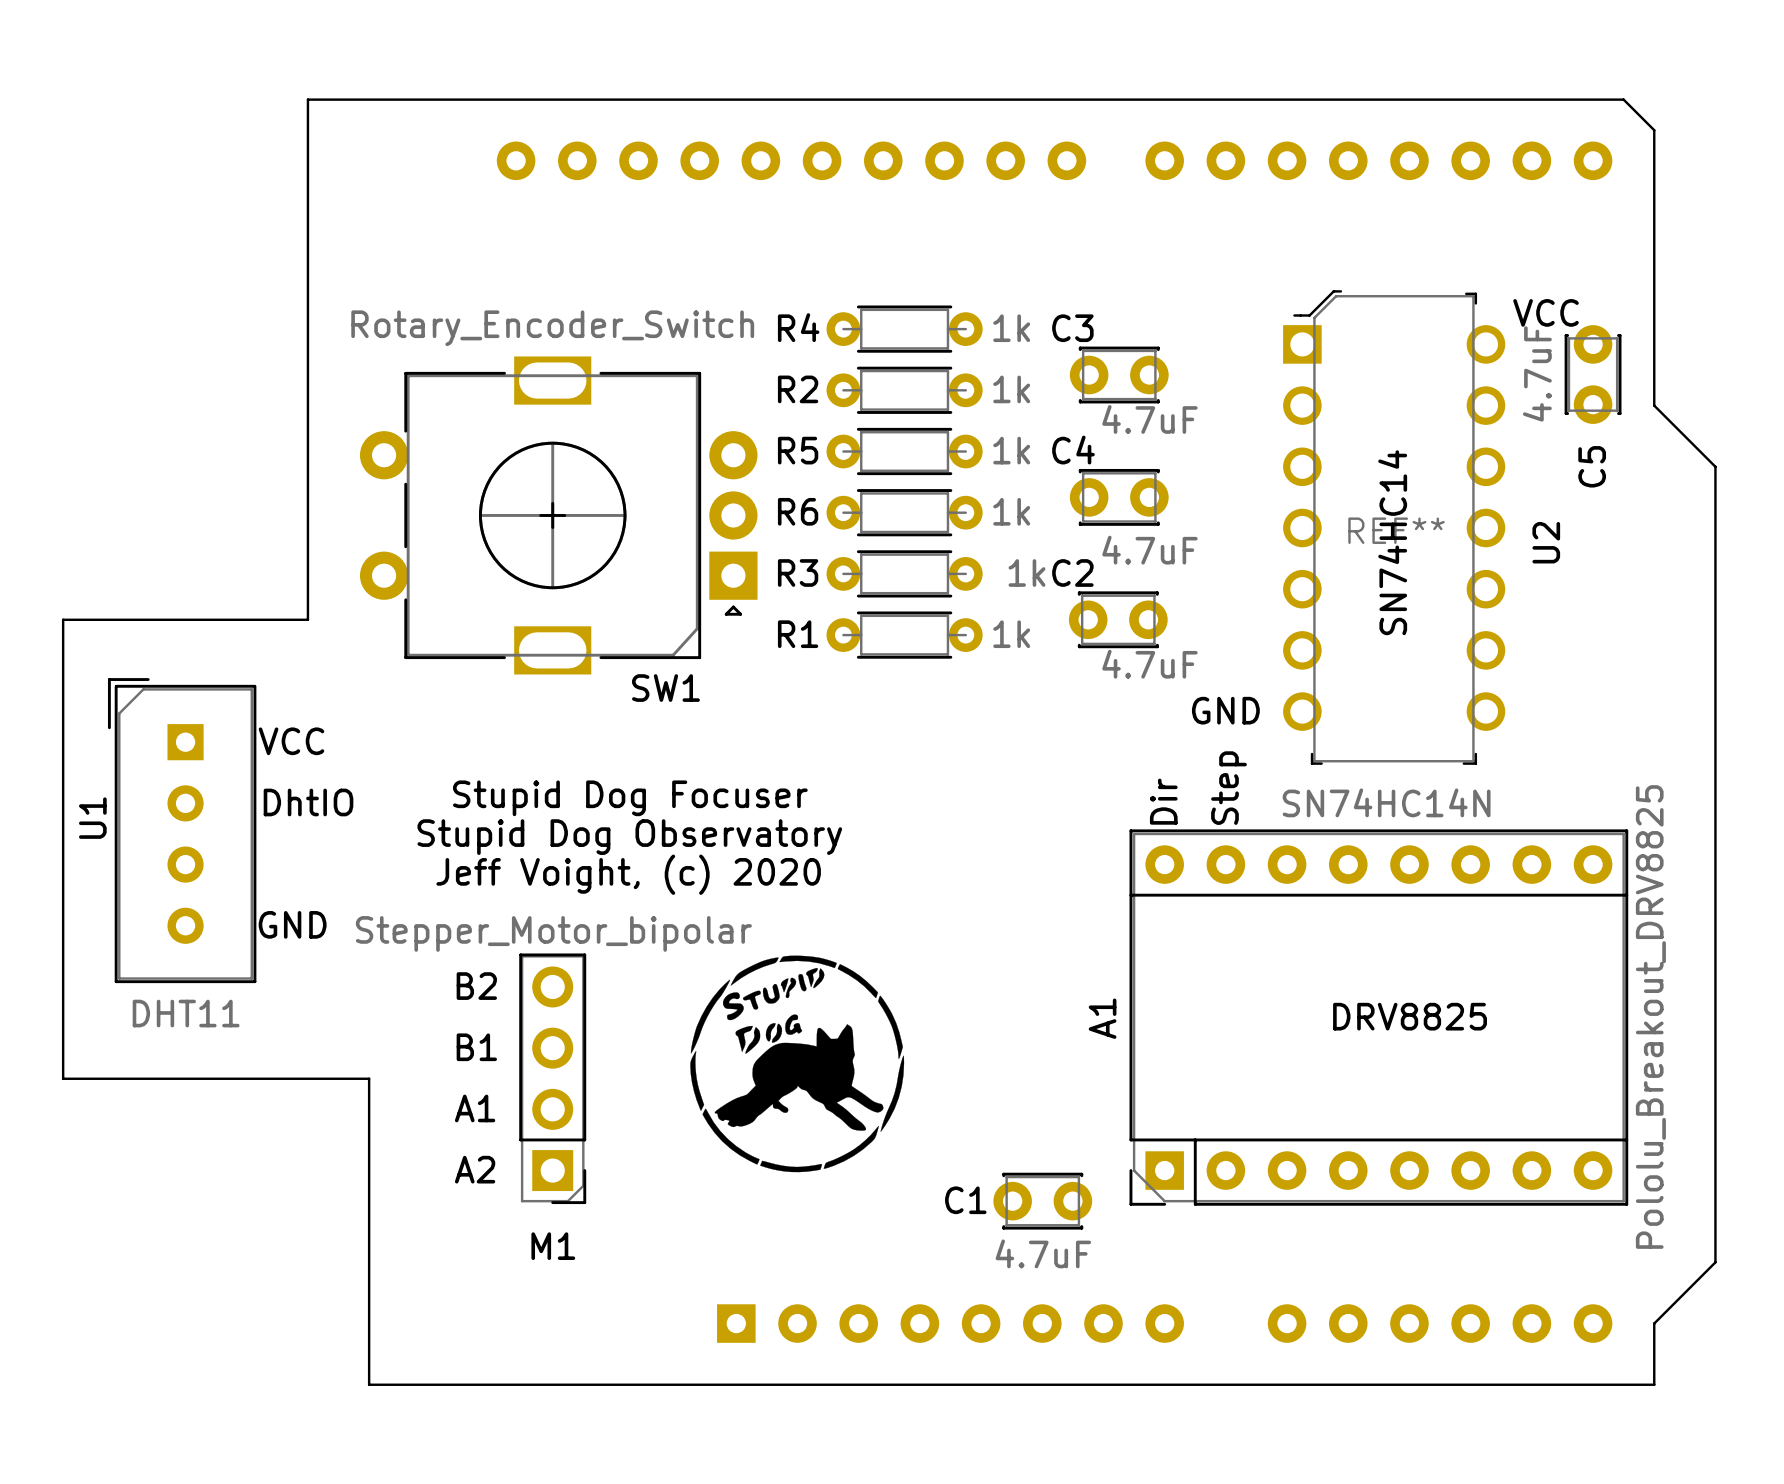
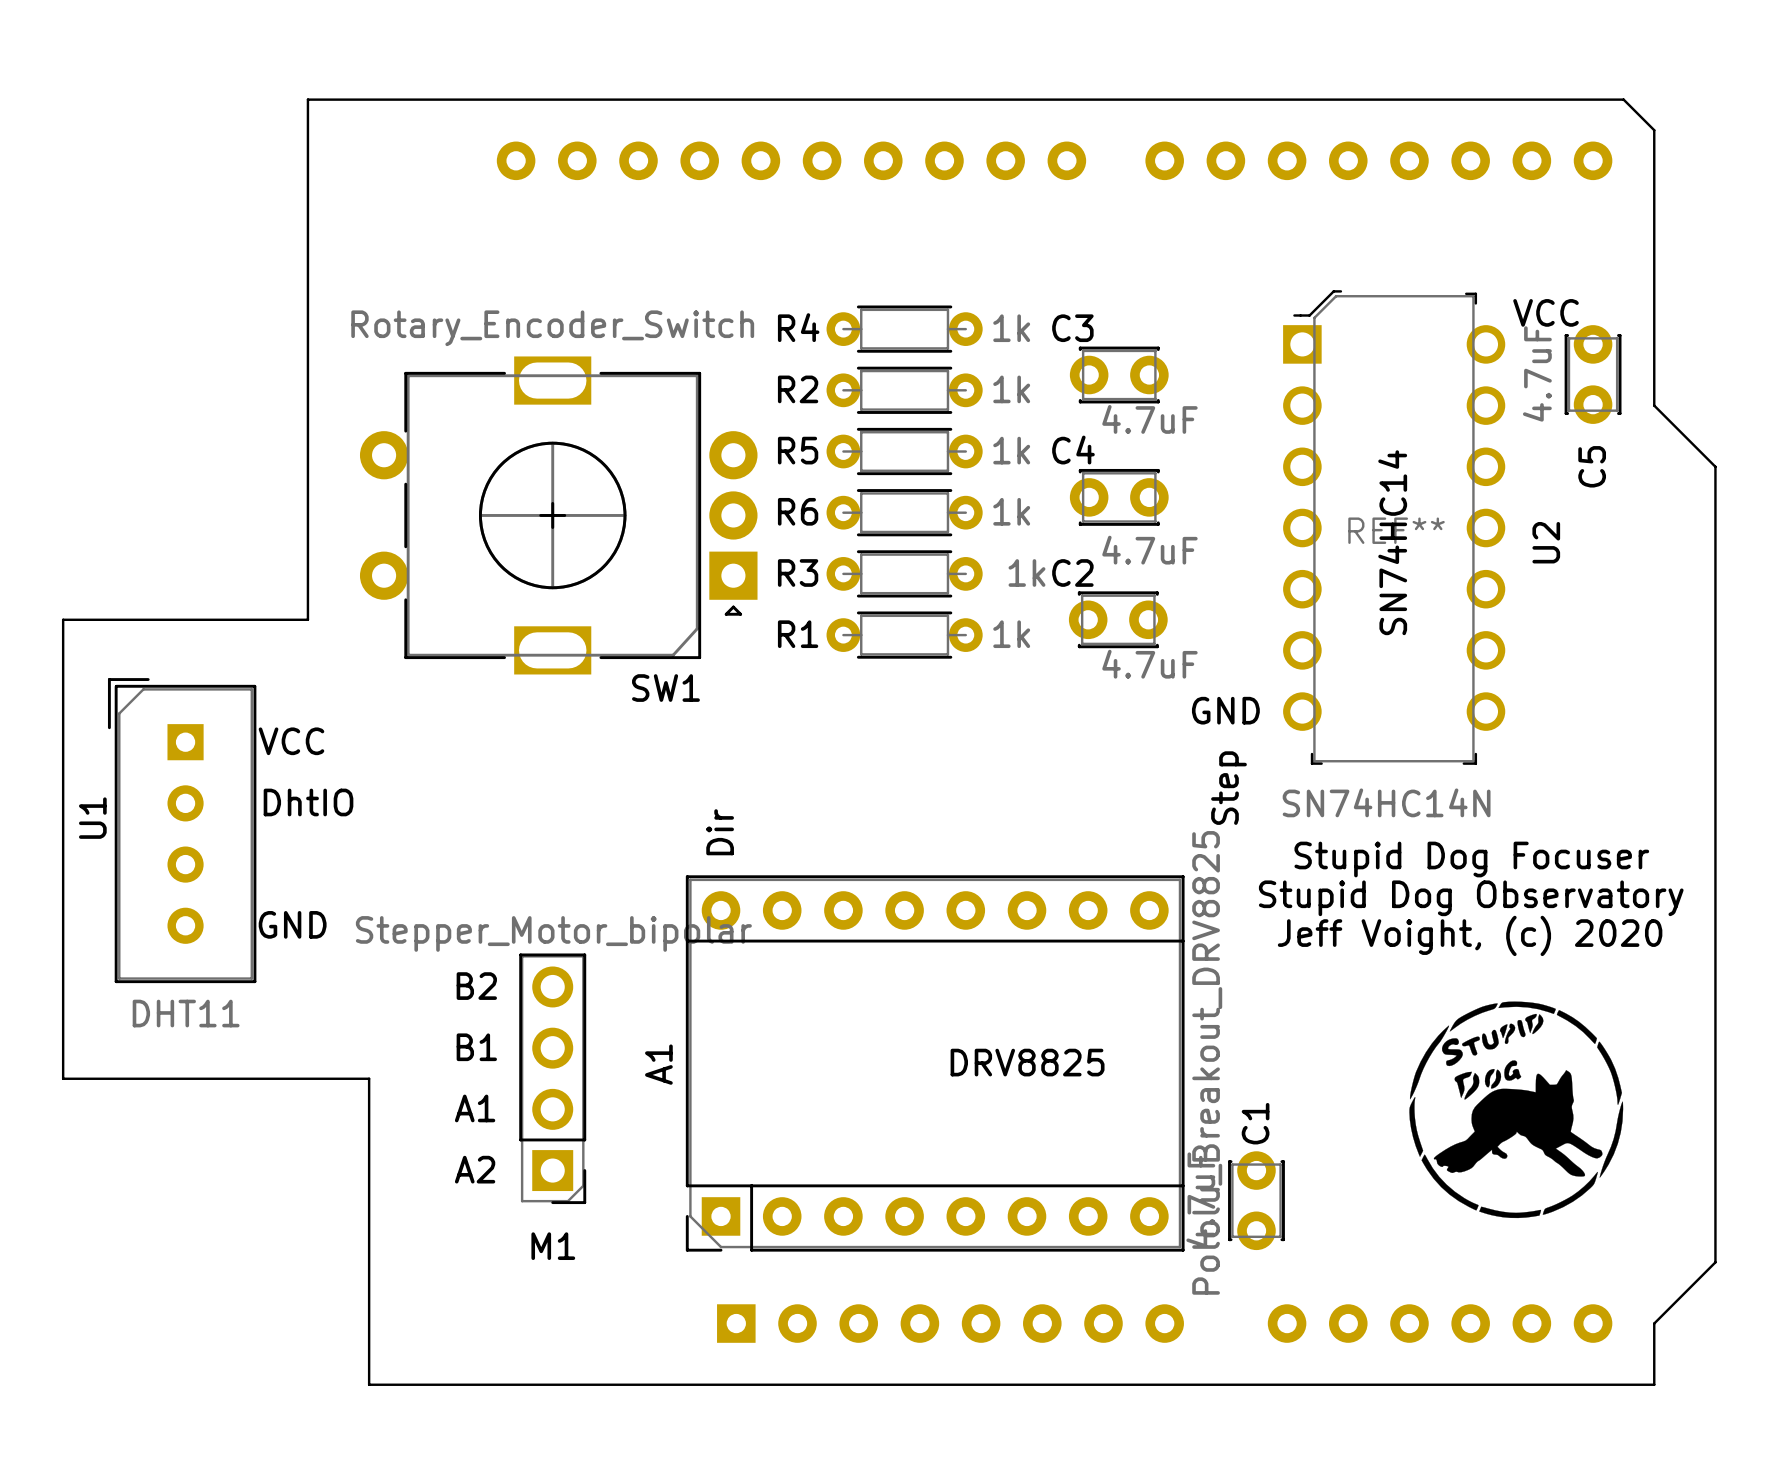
text: Stupid Dog Focuser (630, 798) -> none
text position: Dir (1163, 801) -> Dir (720, 832)
text: Stupid Dog Observatory (629, 837) -> none
text: none -> Stupid Dog Focuser (1471, 859)
text: Jeff Voight, (c) 2020 (628, 874) -> none
text: none -> Stupid Dog Observatory (1471, 898)
text: none -> Jeff Voight, (c) 2020 (1470, 935)
drawing: [690, 955, 905, 1173] -> none
drawing: none -> [1409, 1001, 1624, 1219]
text position: DRV8825 (1410, 1016) -> DRV8825 (1027, 1062)
A1 position: (1378, 1017) -> (935, 1063)
C1 rotation: 0° (1042, 1201) -> 90° clockwise (1256, 1200)
C1 position: (1042, 1201) -> (1256, 1200)

